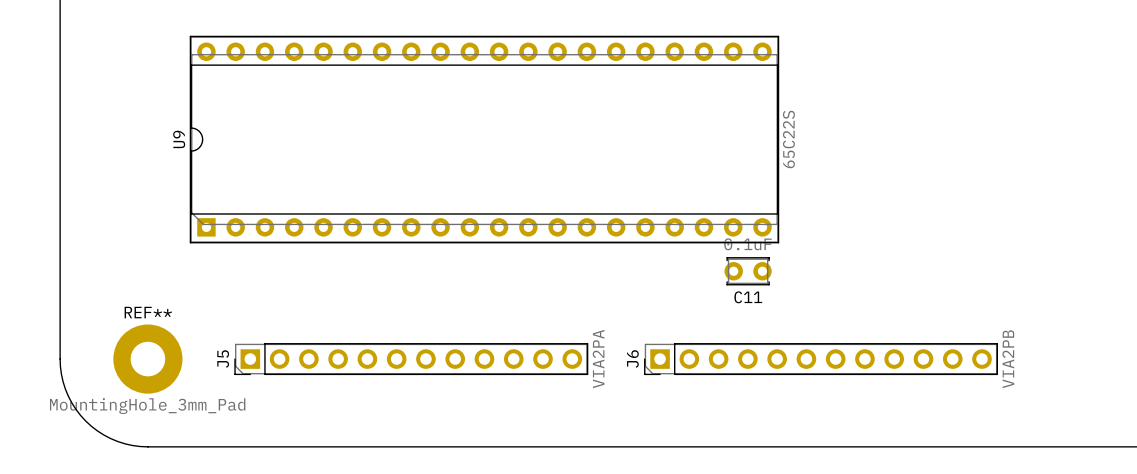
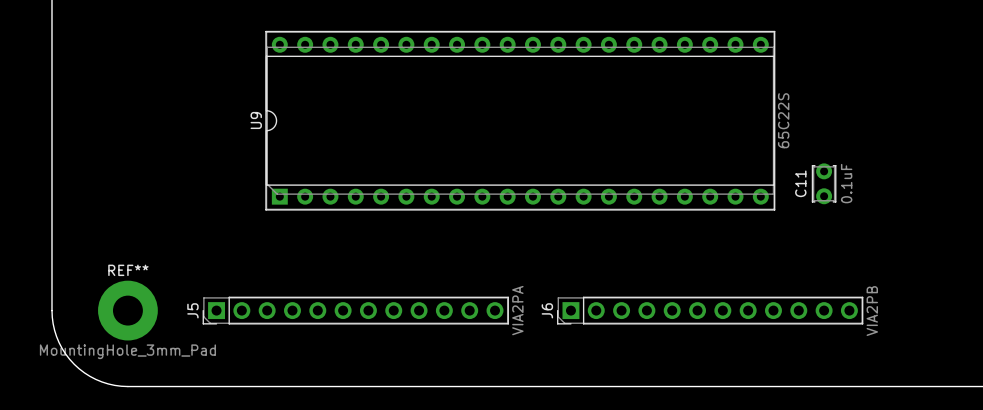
U9 position: (484, 139) -> (520, 120)
C11 rotation: 0° (748, 271) -> 90° clockwise (824, 183)
C11 position: (748, 271) -> (824, 183)

